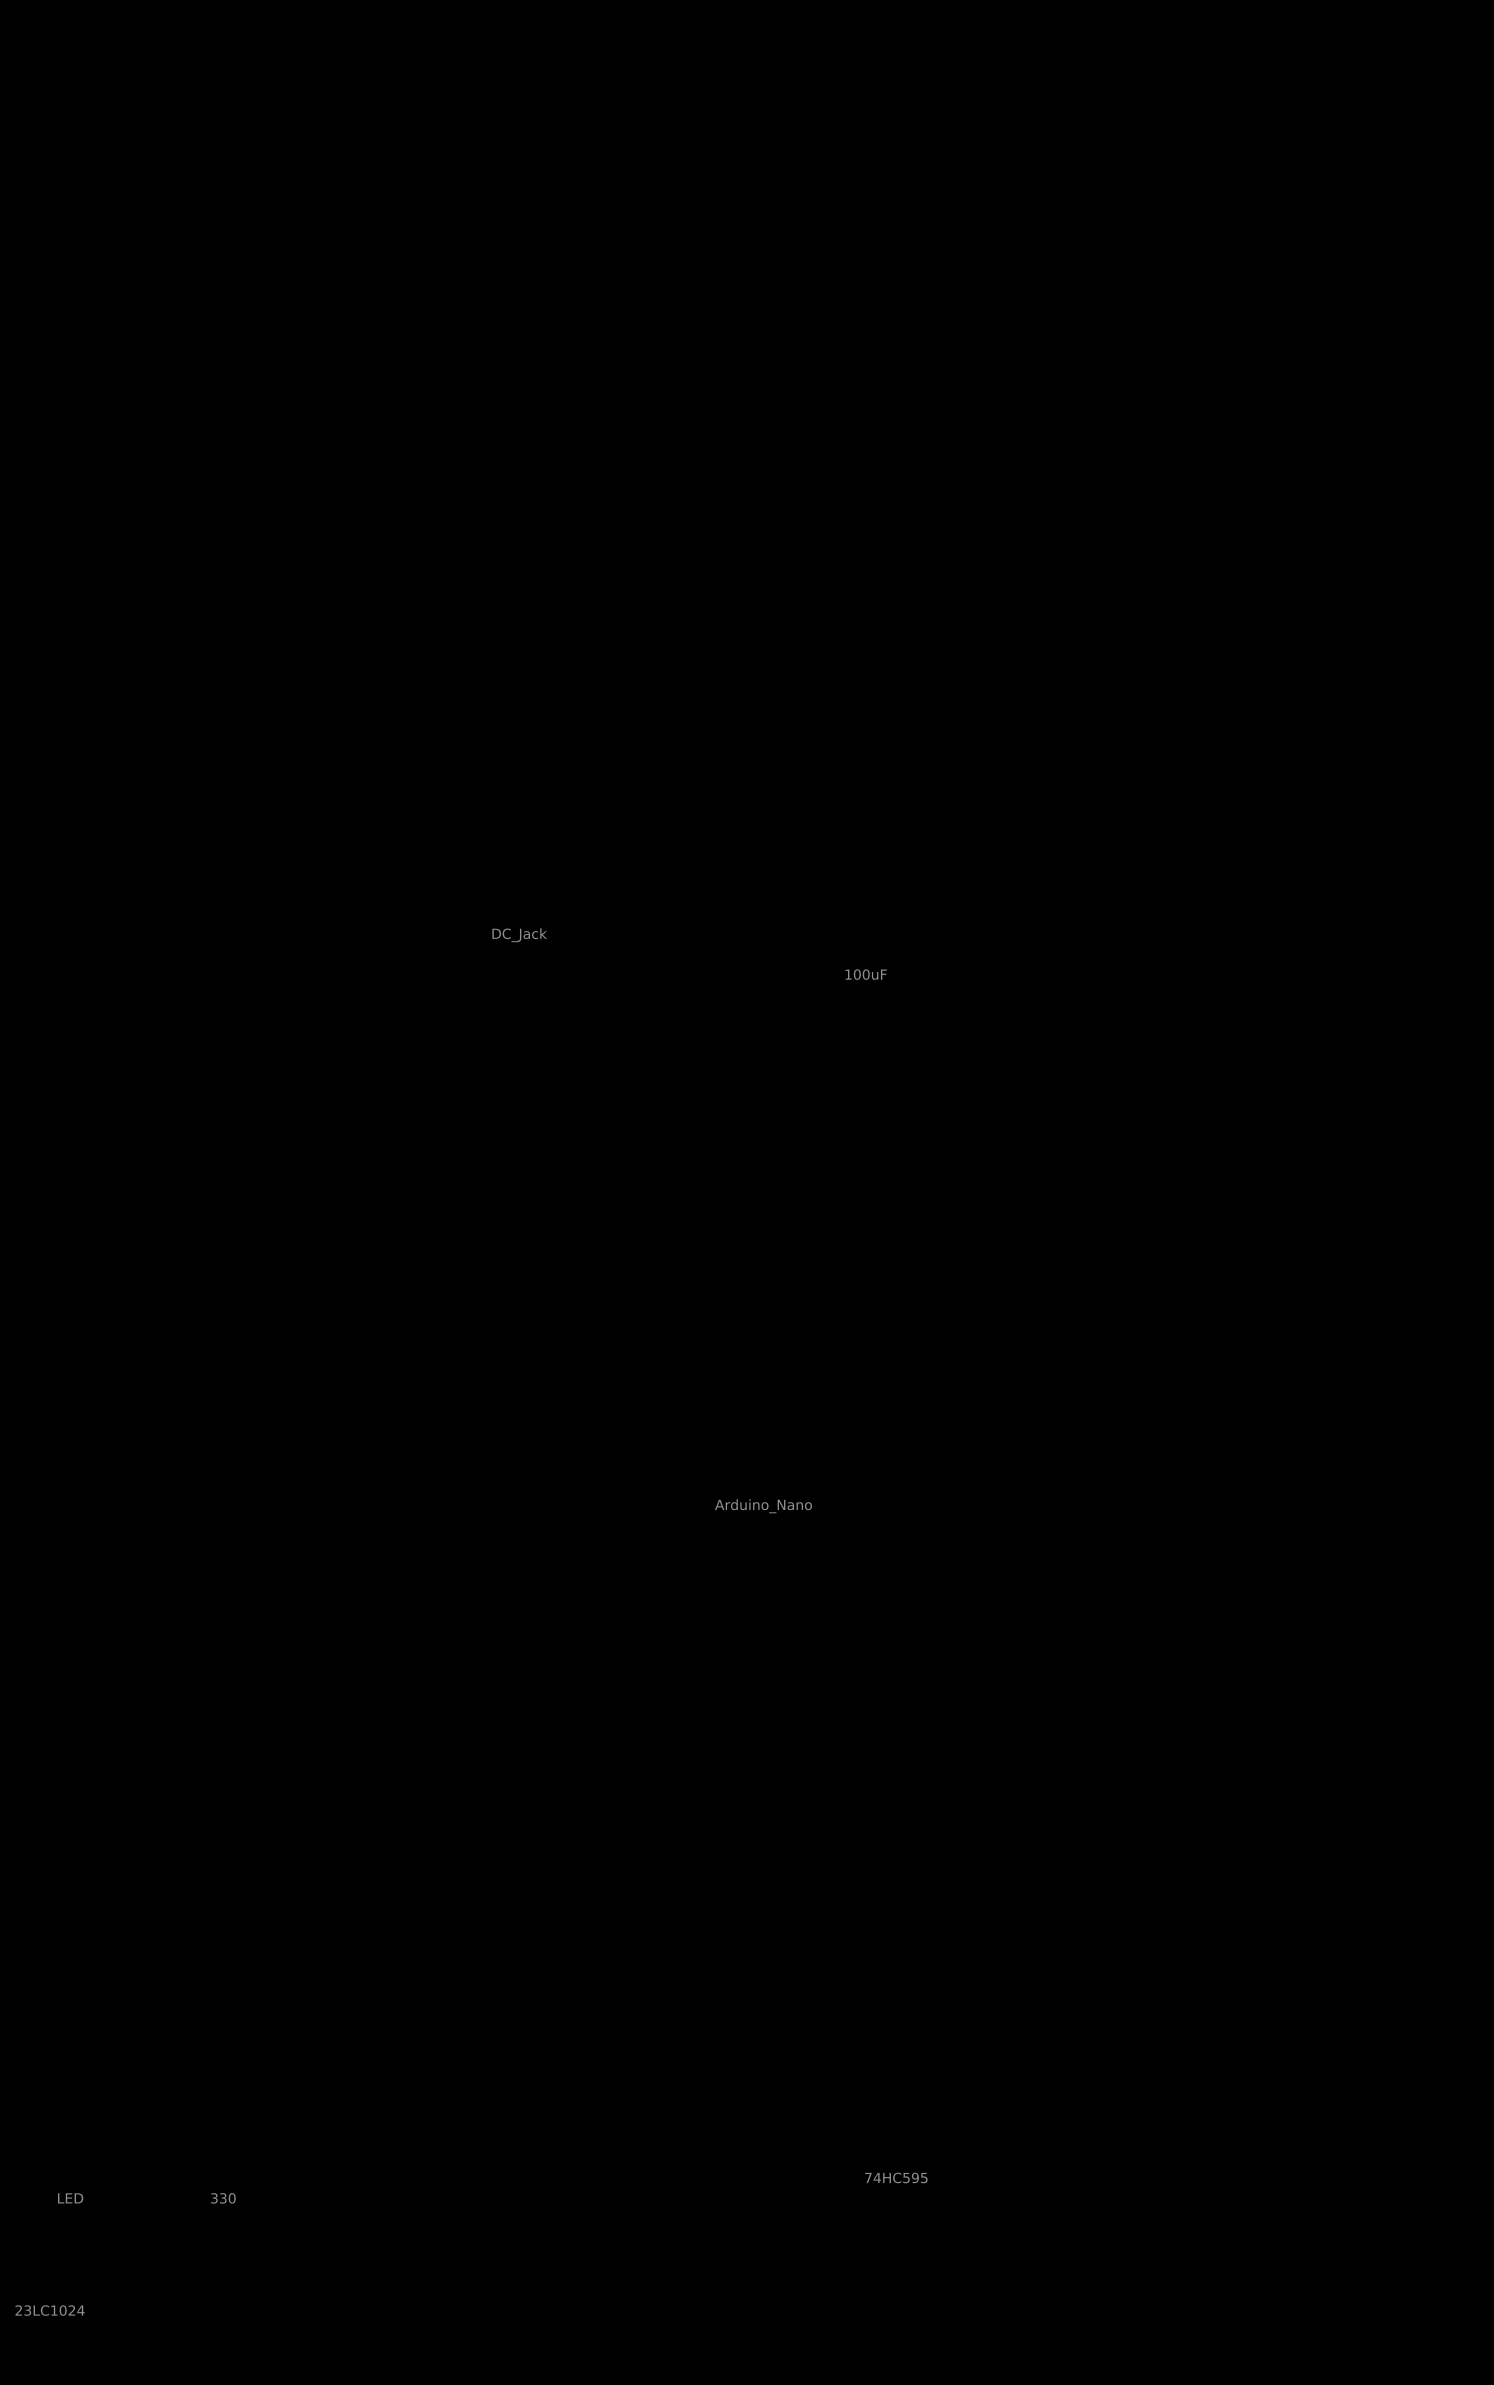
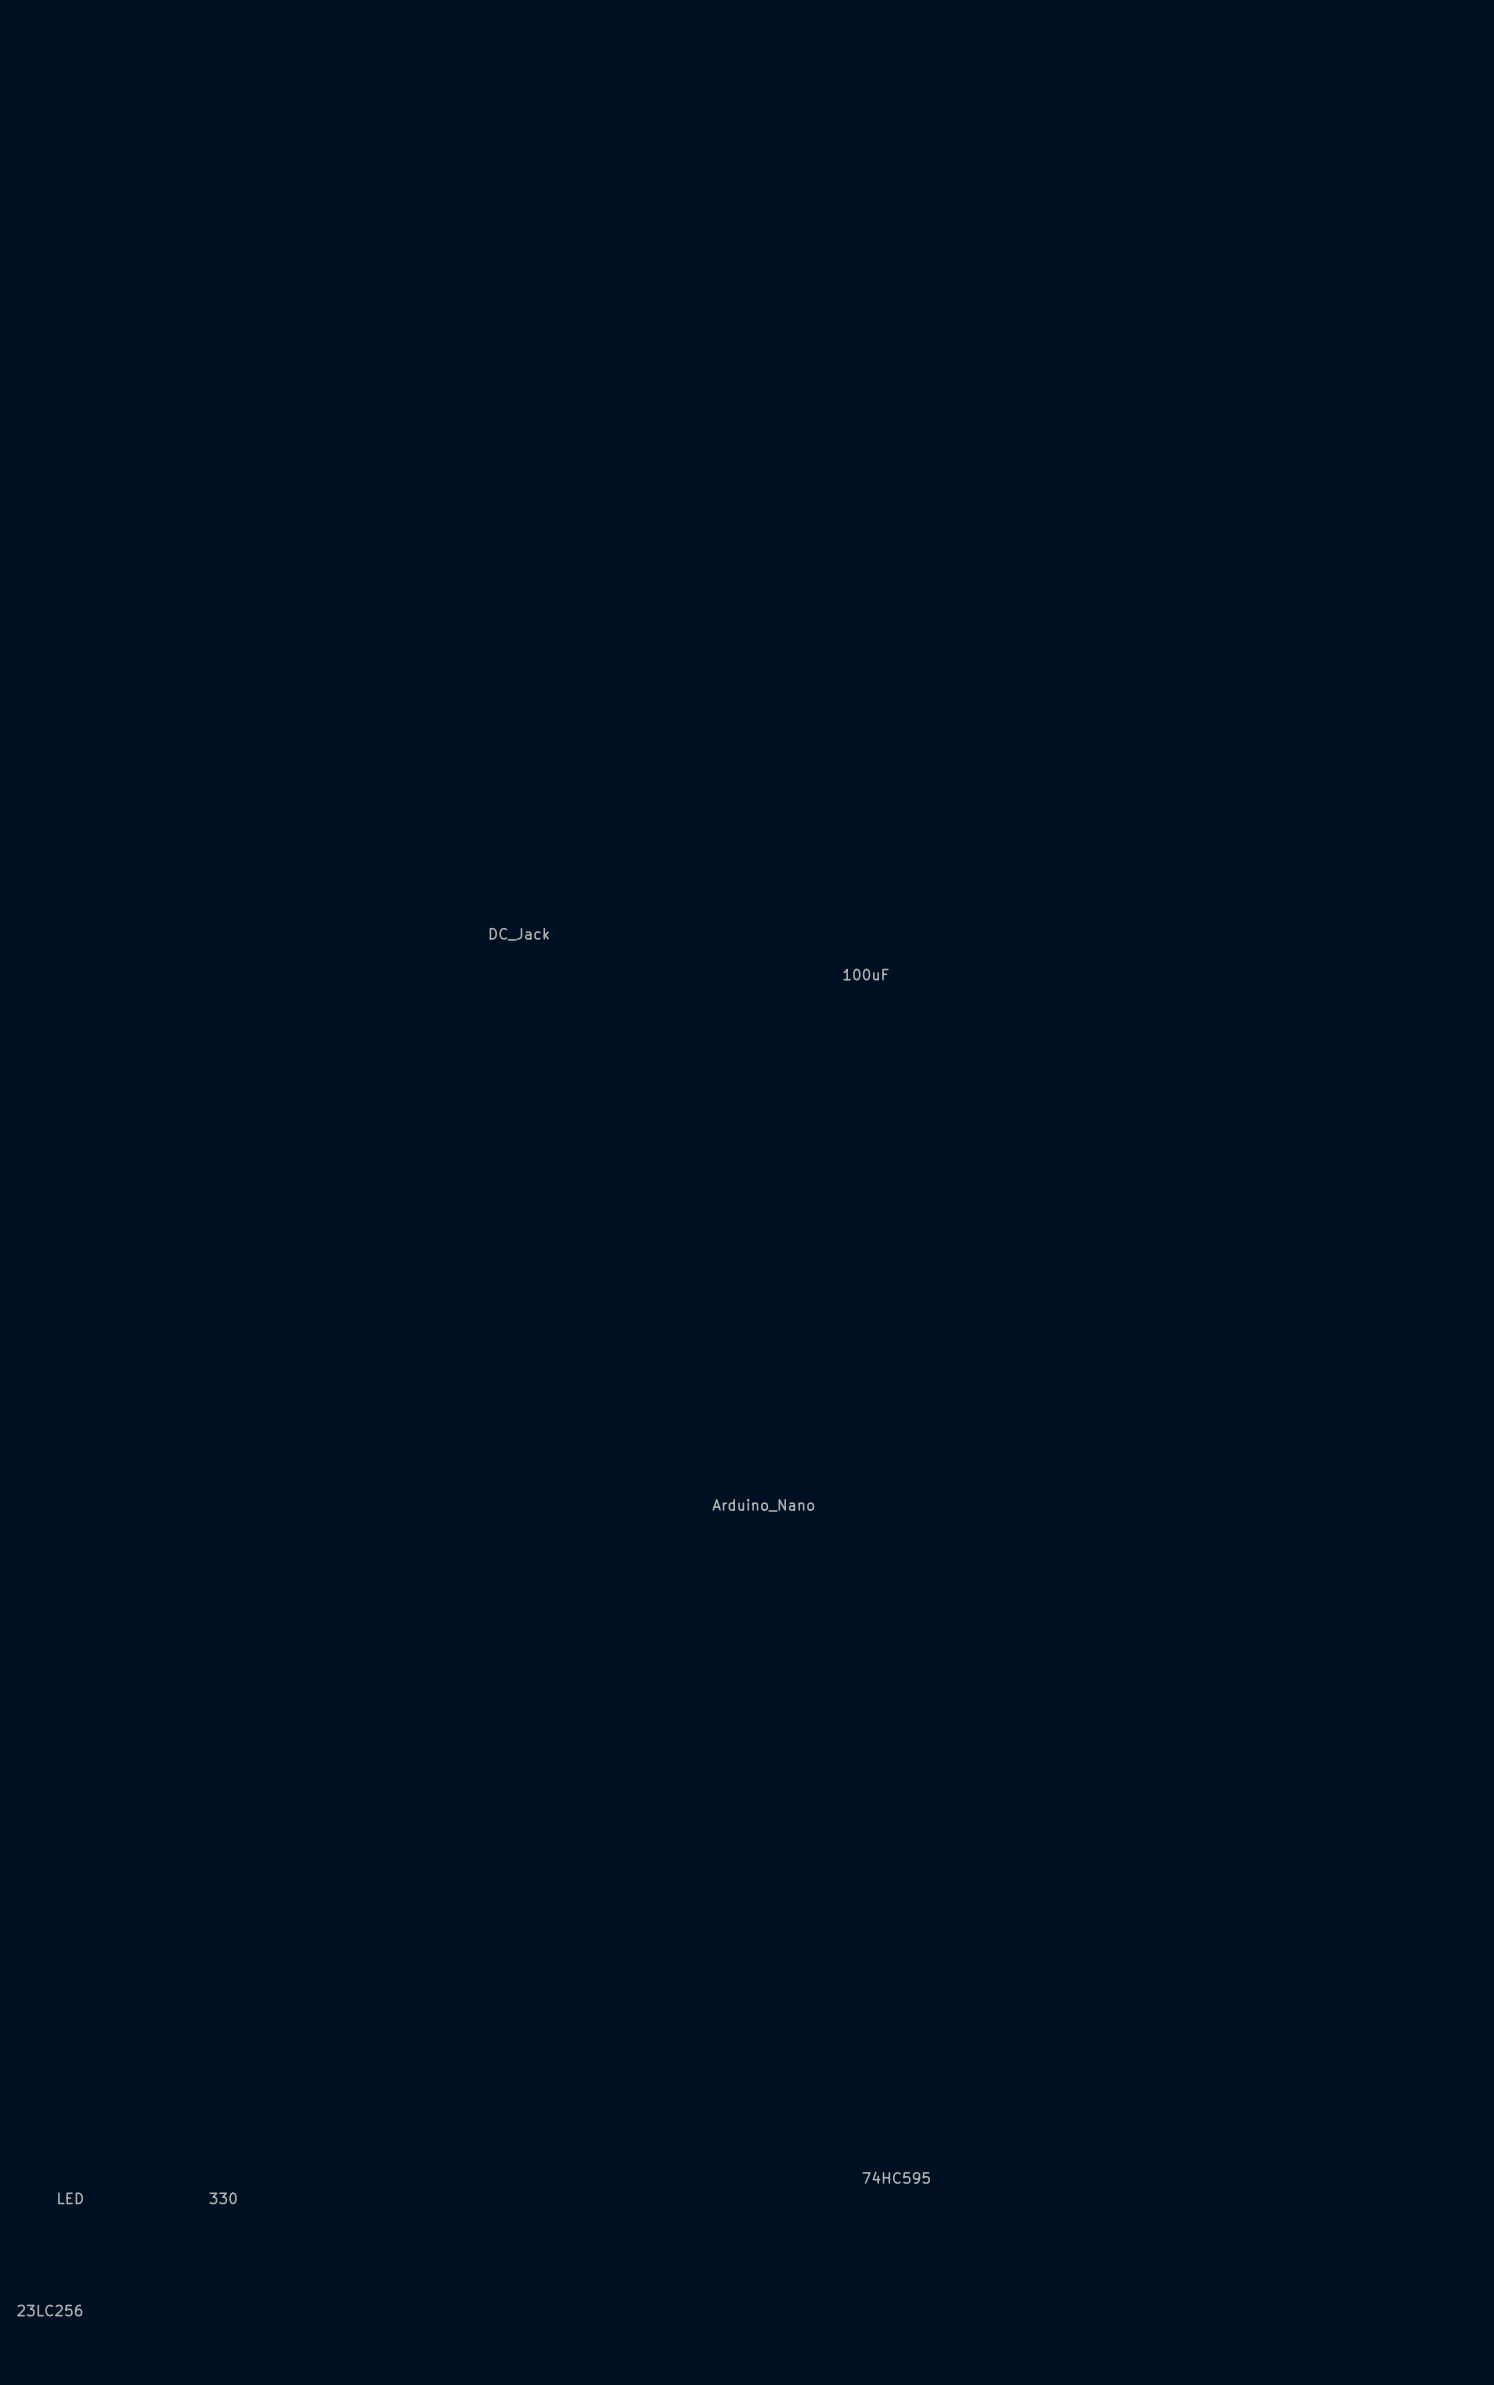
part value: 23LC1024 (50, 2310) -> 23LC256 (49, 2310)

